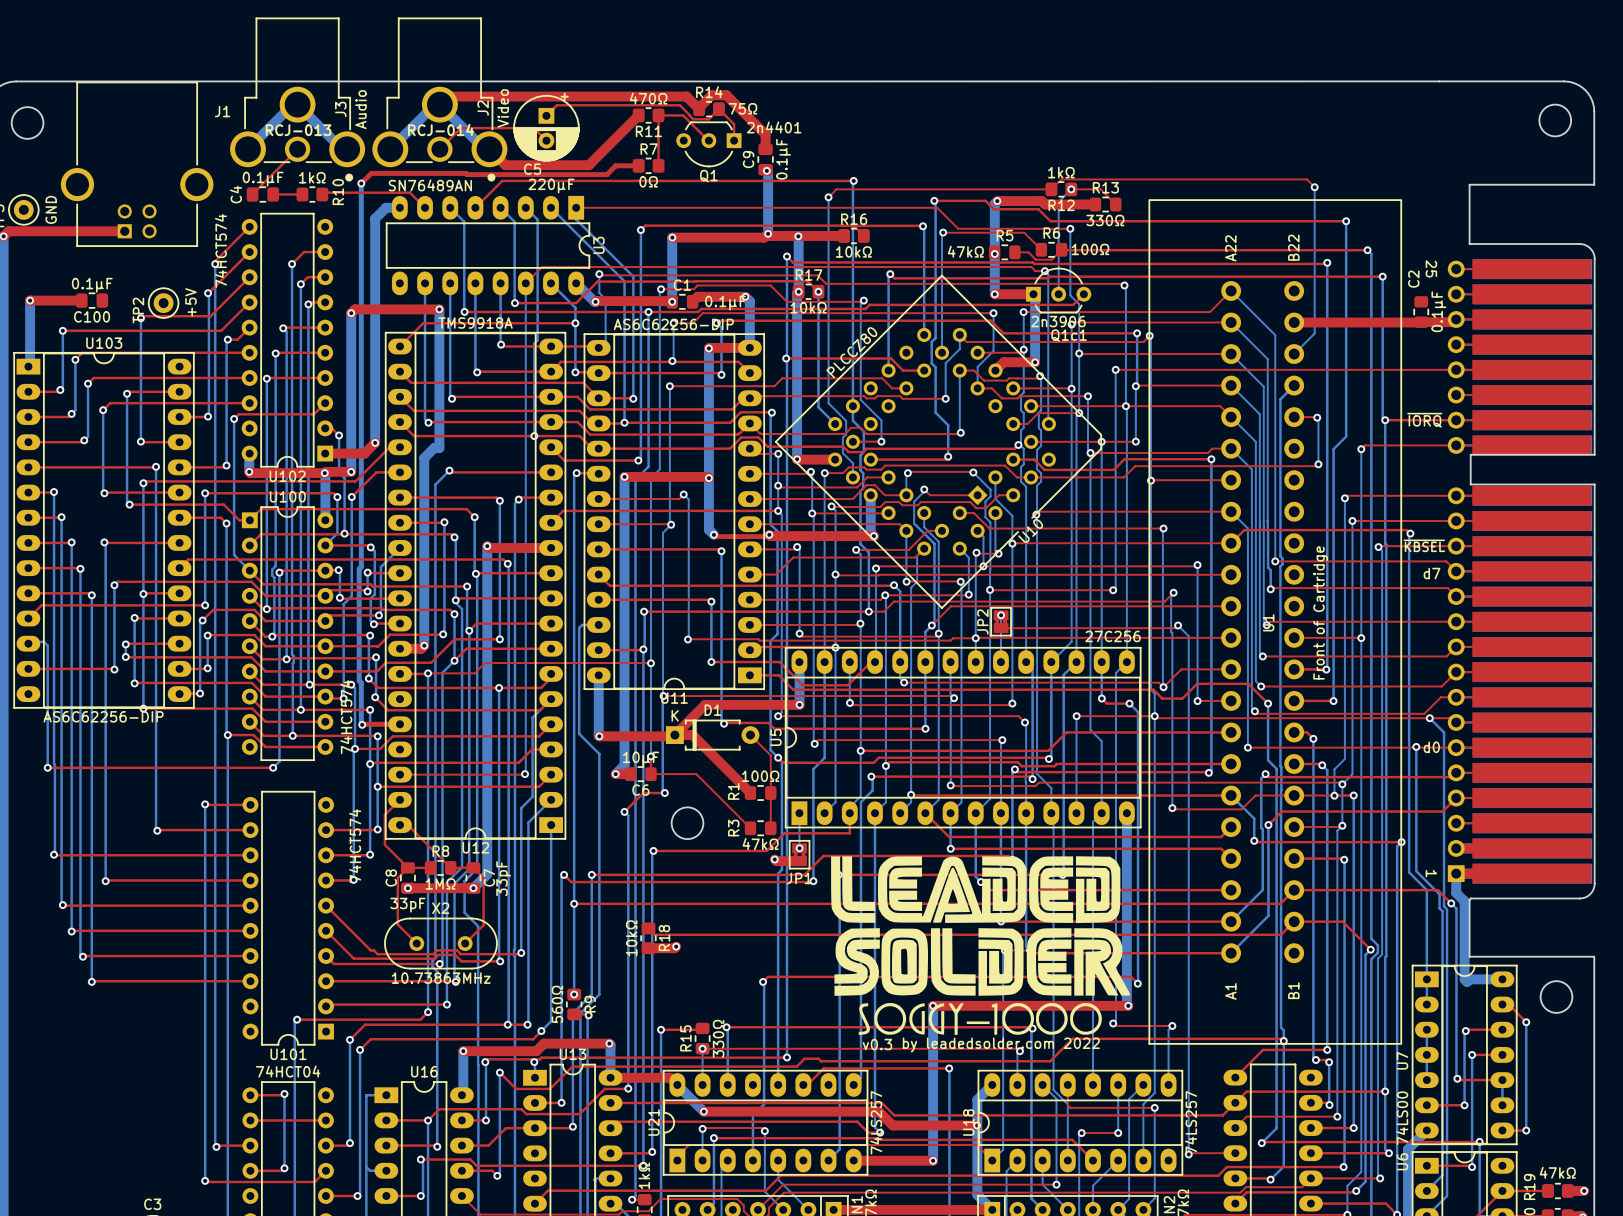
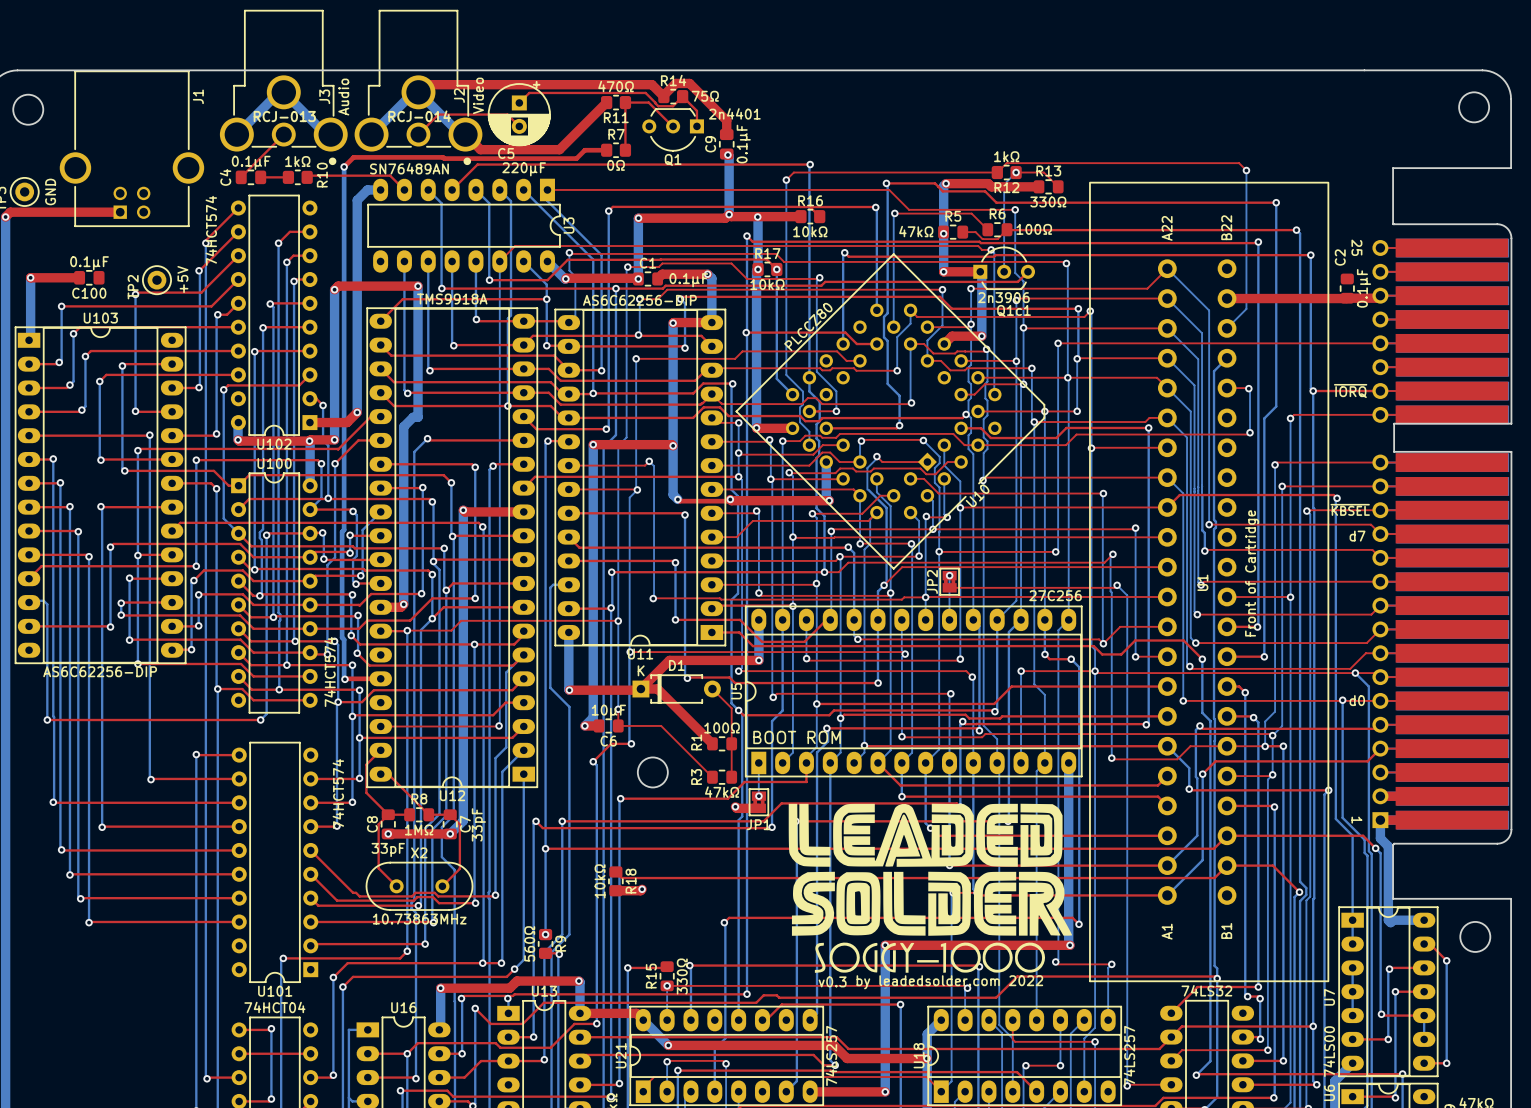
J1 name rotation: 0° (222, 111) -> 90° counterclockwise (198, 96)
text: none -> BOOT ROM (797, 737)
part value: none -> 74LS32 (1206, 990)

